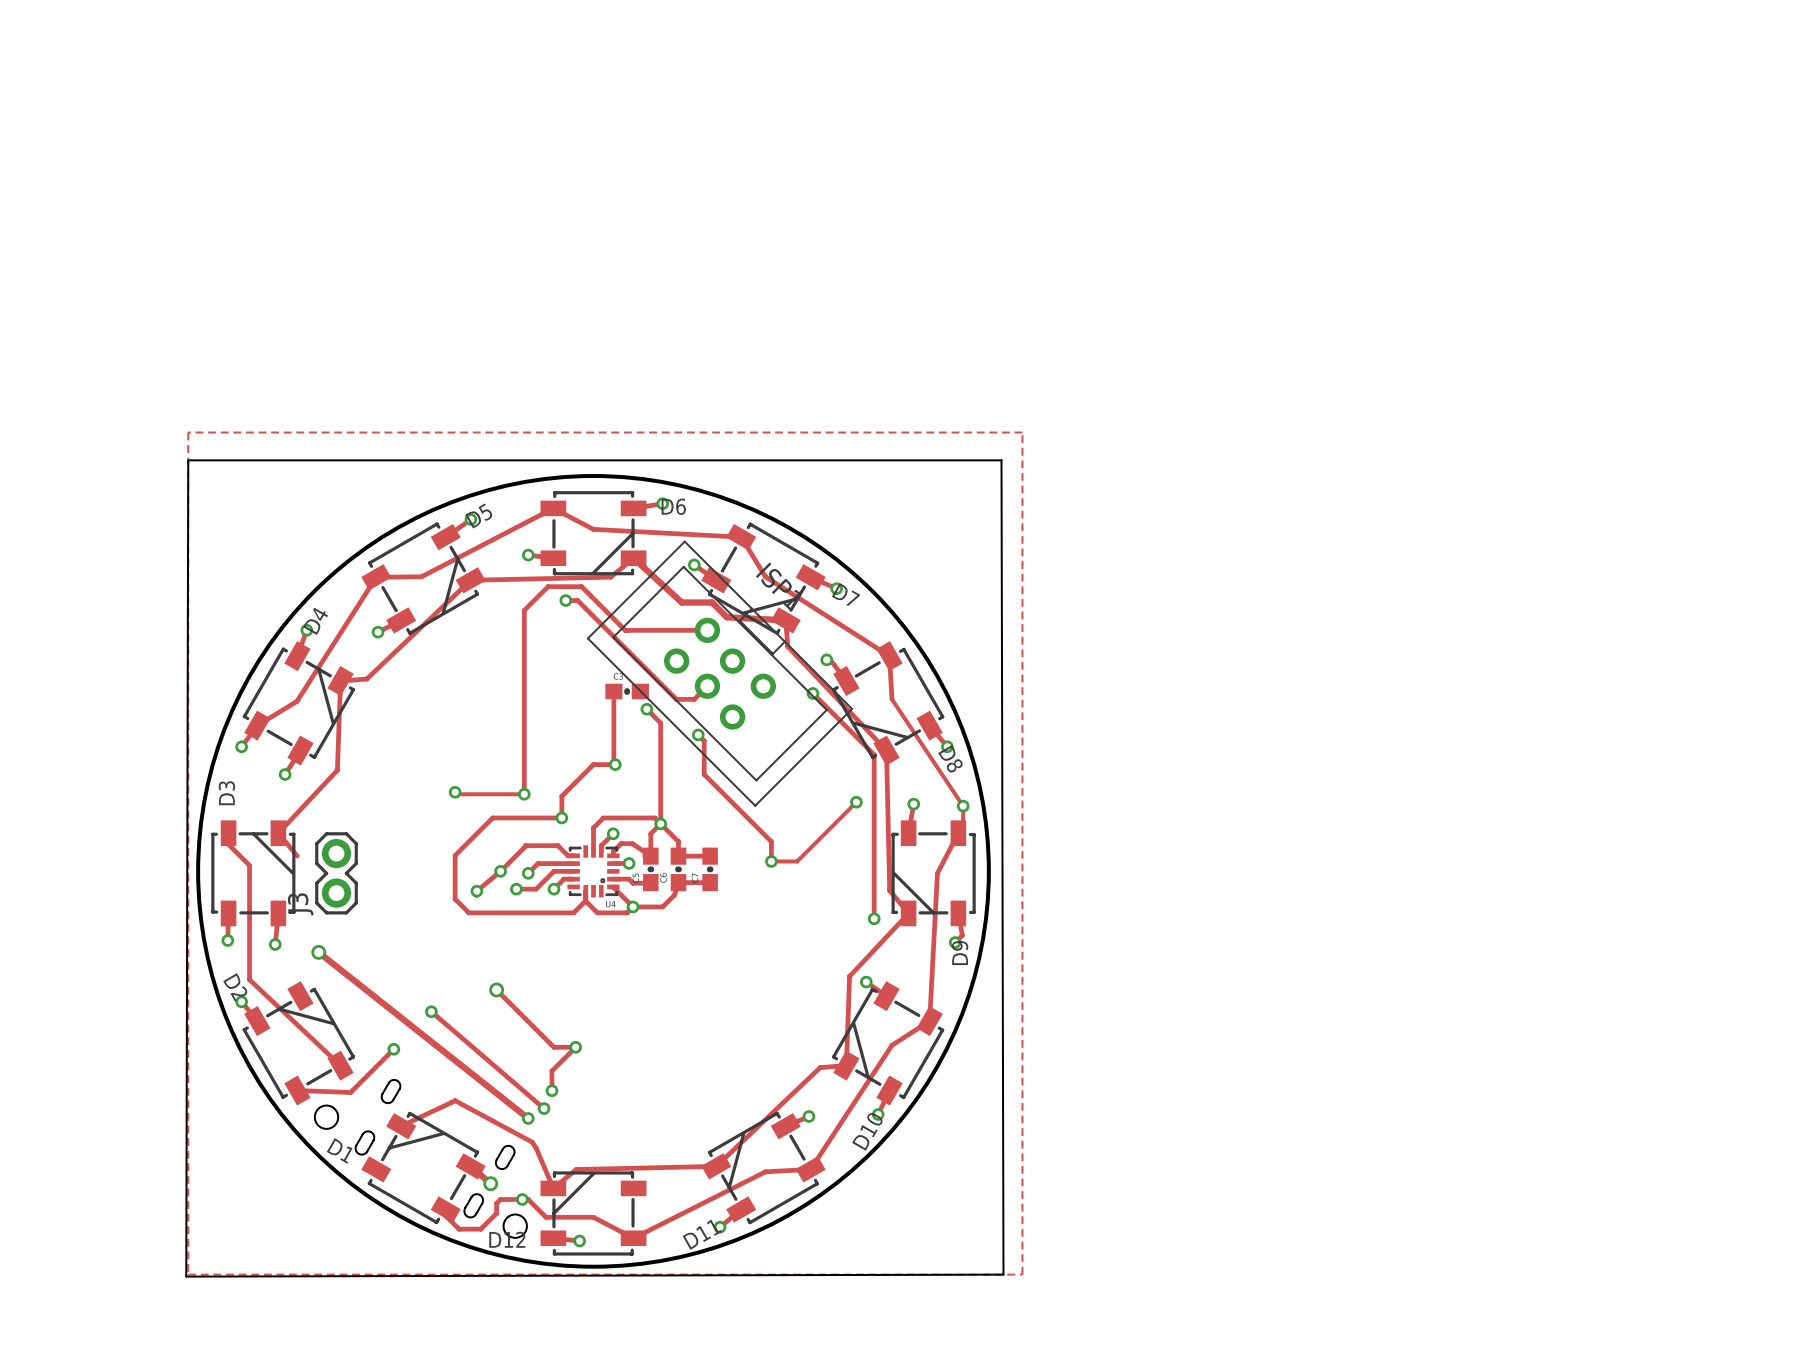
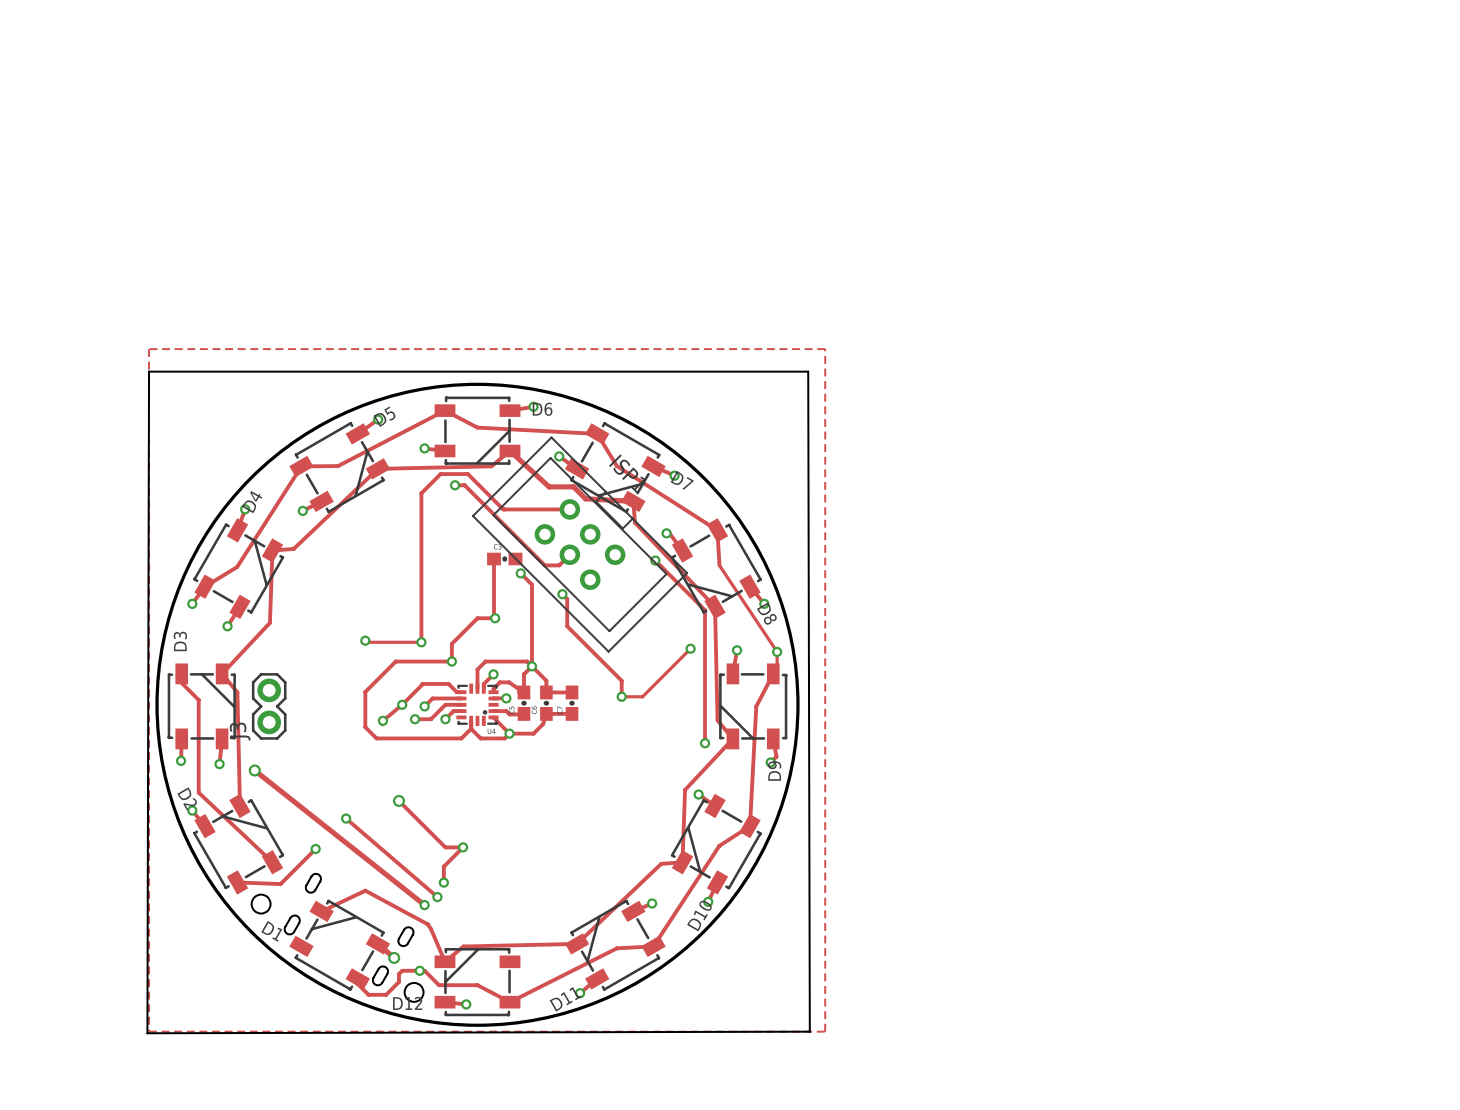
track: none -> (237, 692) (239, 805)

